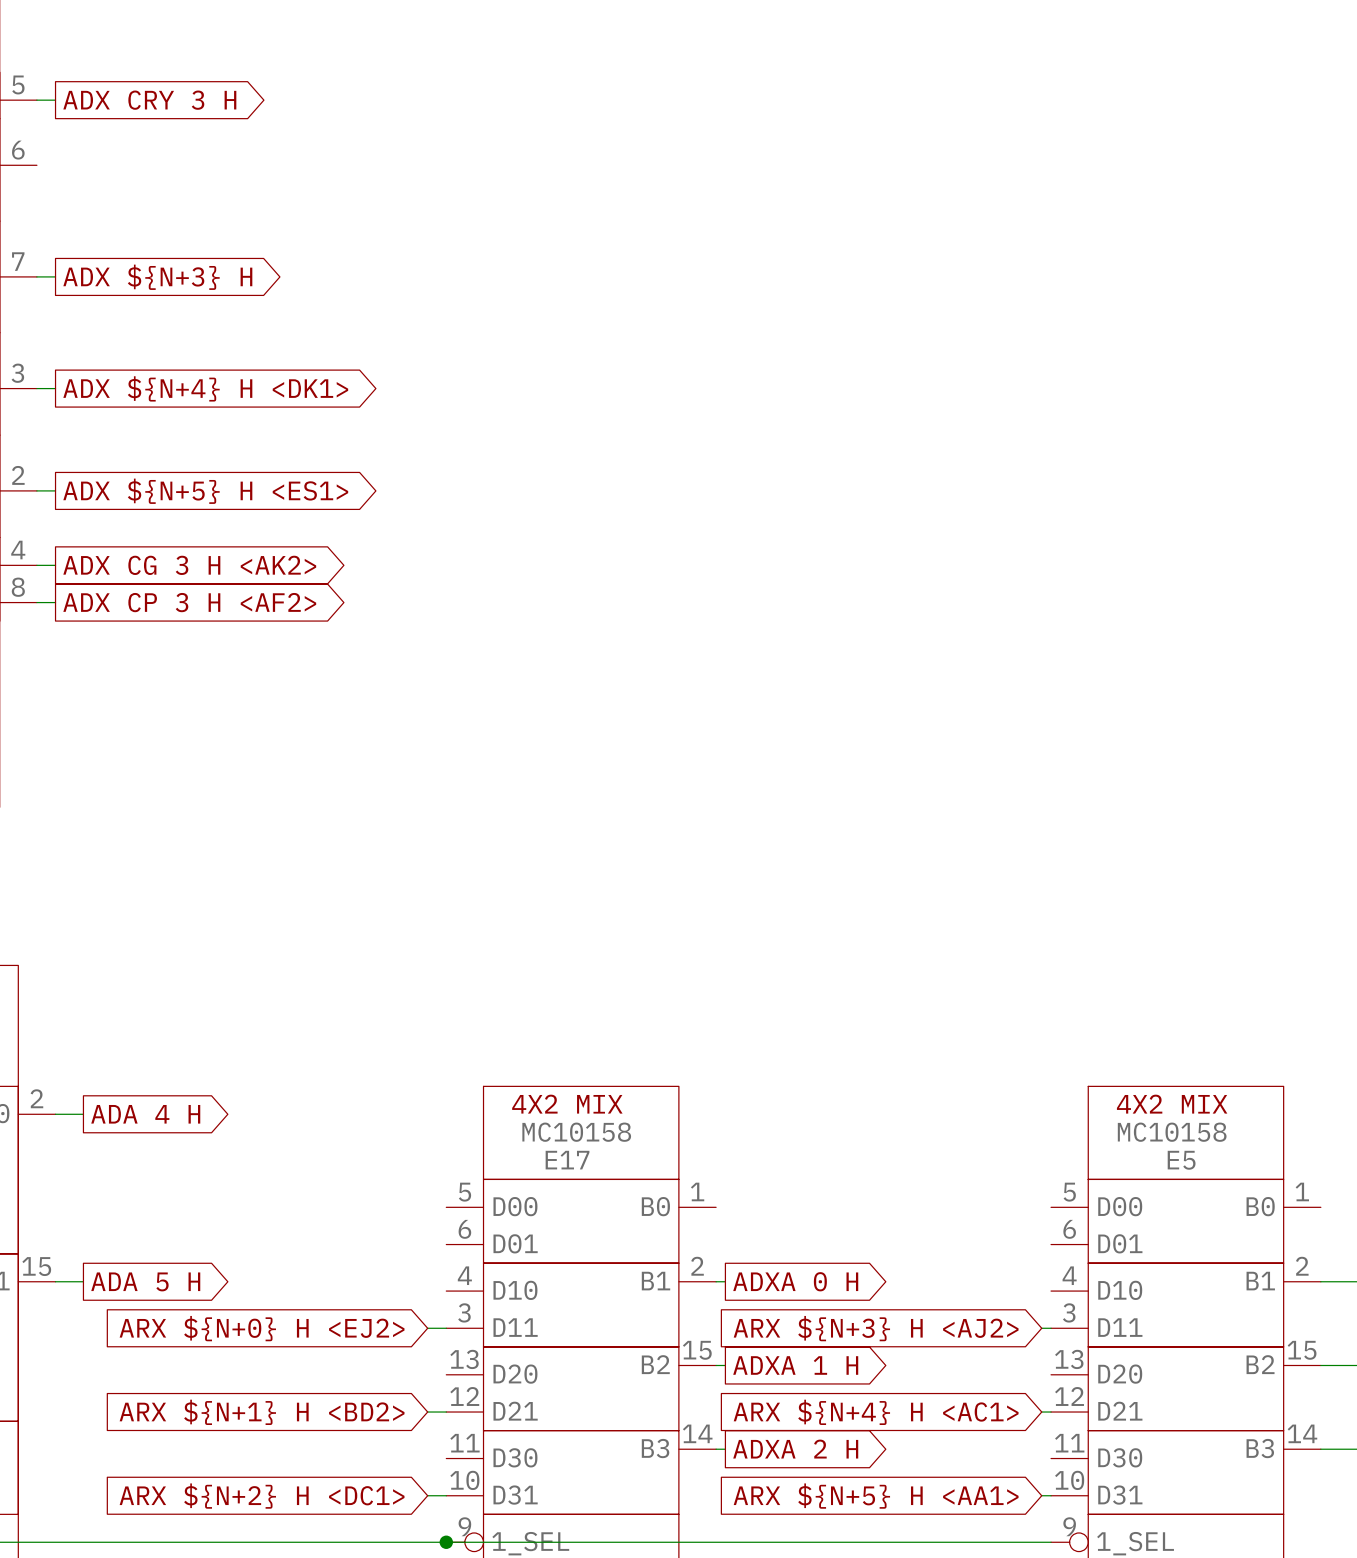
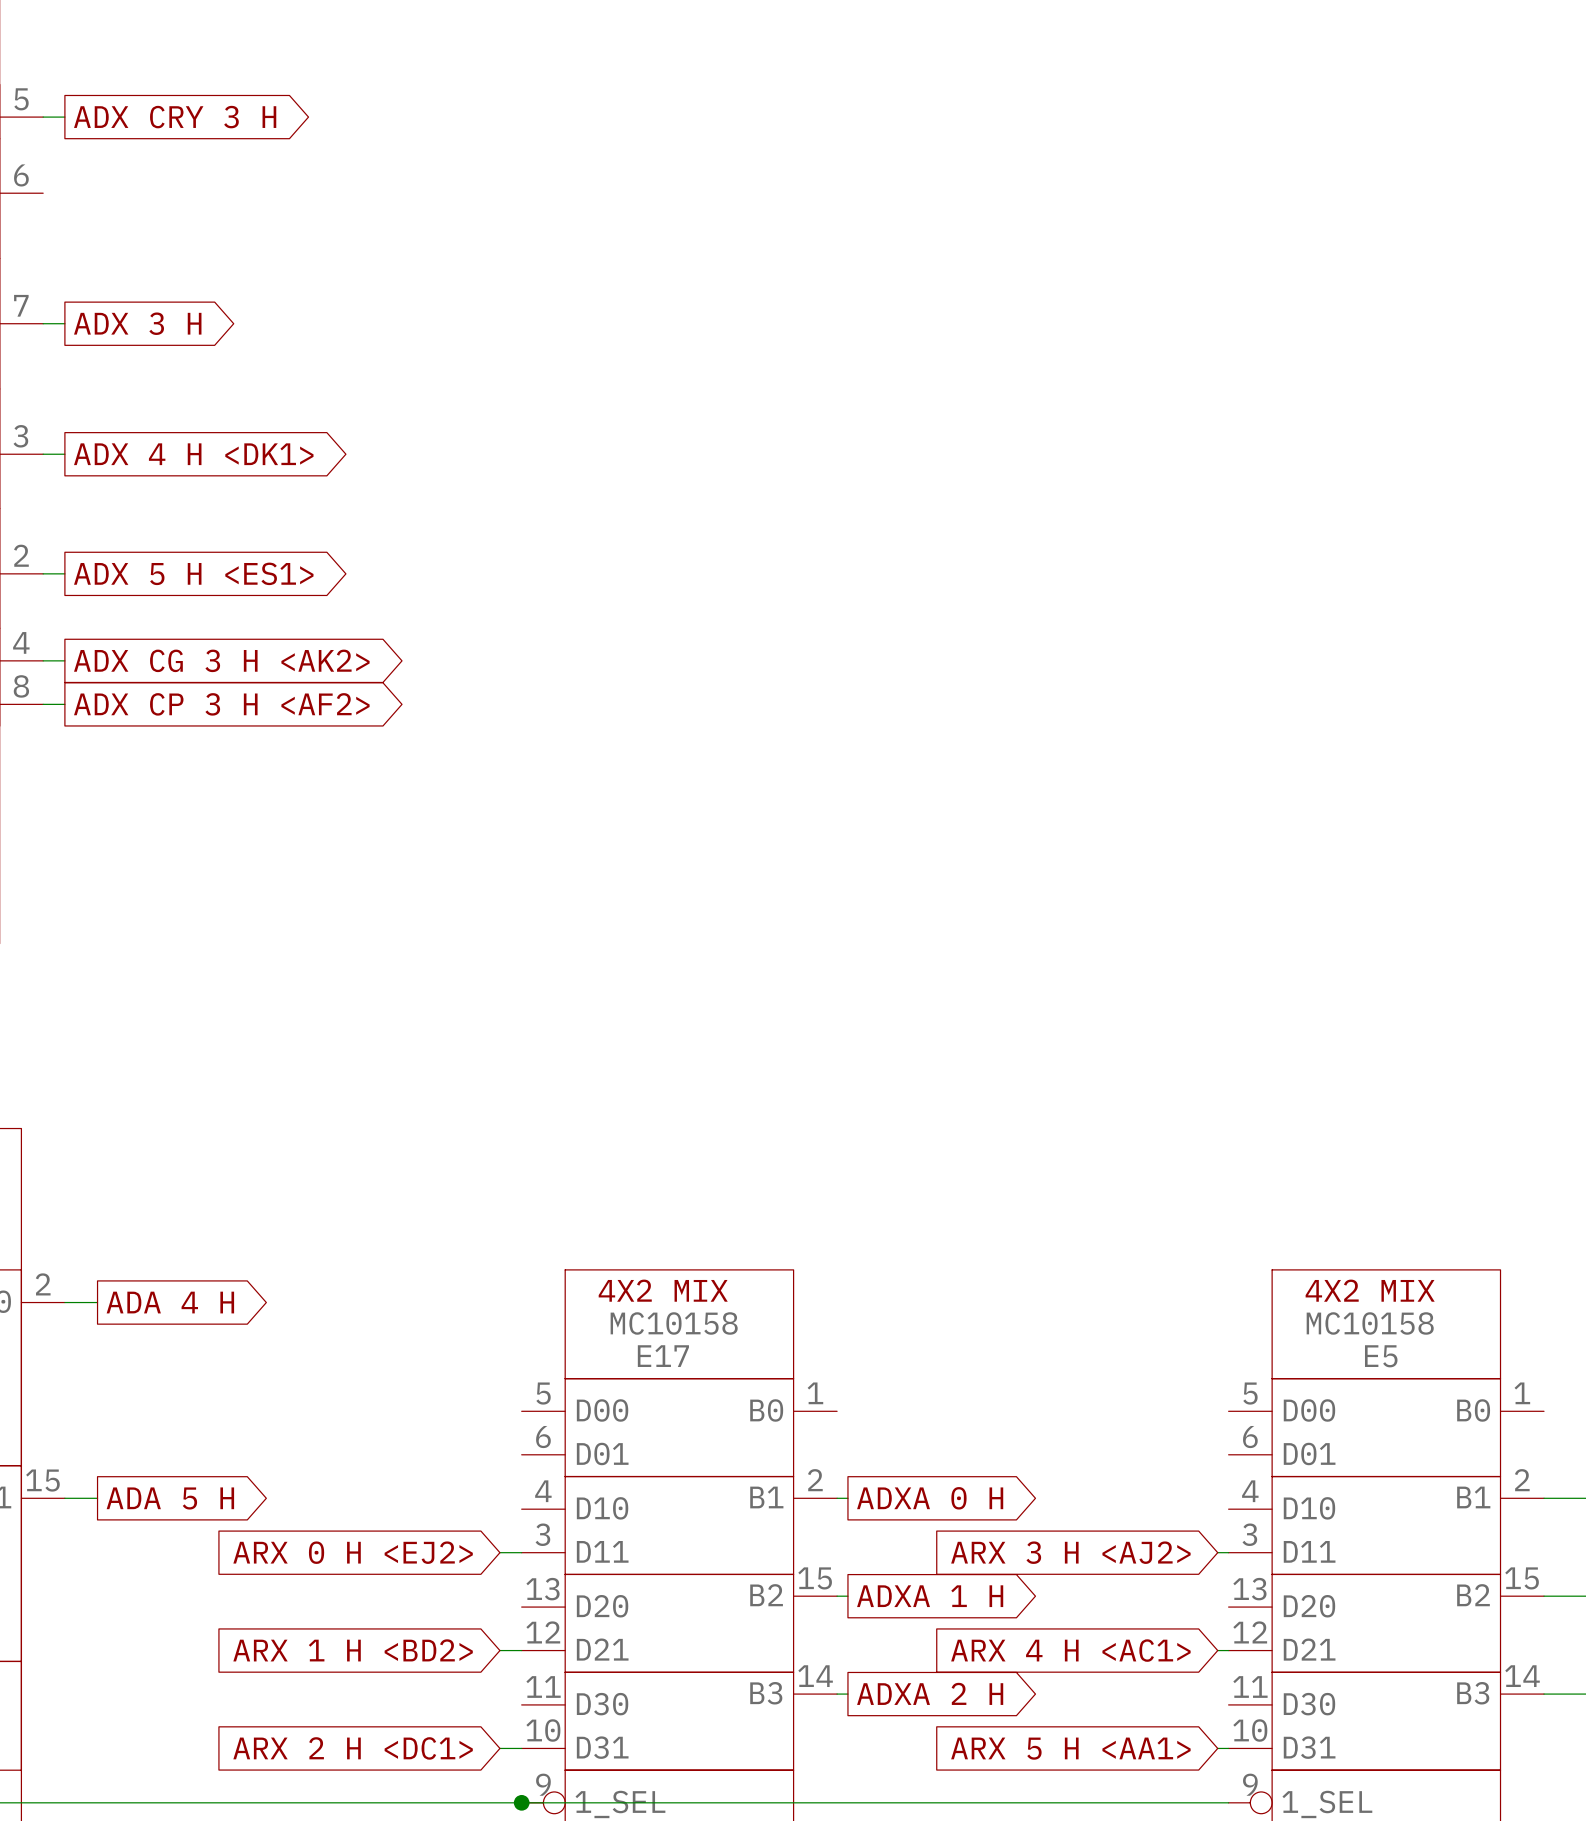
global label: ADX ${N+3} H (157, 277) -> ADX 3 H (137, 323)
global label: ADX ${N+4} H <DK1> (205, 388) -> ADX 4 H <DK1> (193, 454)
global label: ADX ${N+5} H <ES1> (205, 491) -> ADX 5 H <ES1> (193, 573)
global label: ARX ${N+0} H <EJ2> (262, 1328) -> ARX 0 H <EJ2> (353, 1552)
global label: ARX ${N+3} H <AJ2> (876, 1328) -> ARX 3 H <AJ2> (1070, 1552)
global label: ARX ${N+1} H <BD2> (262, 1412) -> ARX 1 H <BD2> (353, 1650)
global label: ARX ${N+4} H <AC1> (876, 1412) -> ARX 4 H <AC1> (1070, 1650)
global label: ARX ${N+2} H <DC1> (262, 1496) -> ARX 2 H <DC1> (353, 1748)
global label: ARX ${N+5} H <AA1> (876, 1496) -> ARX 5 H <AA1> (1070, 1748)

